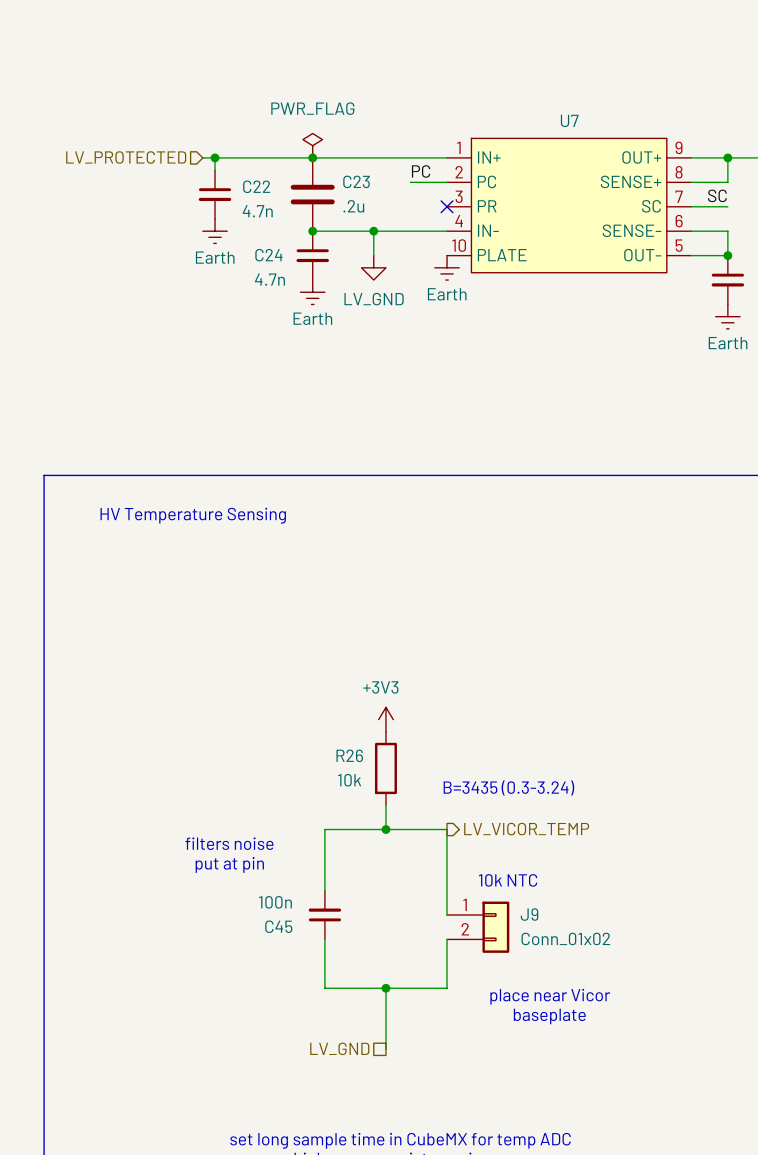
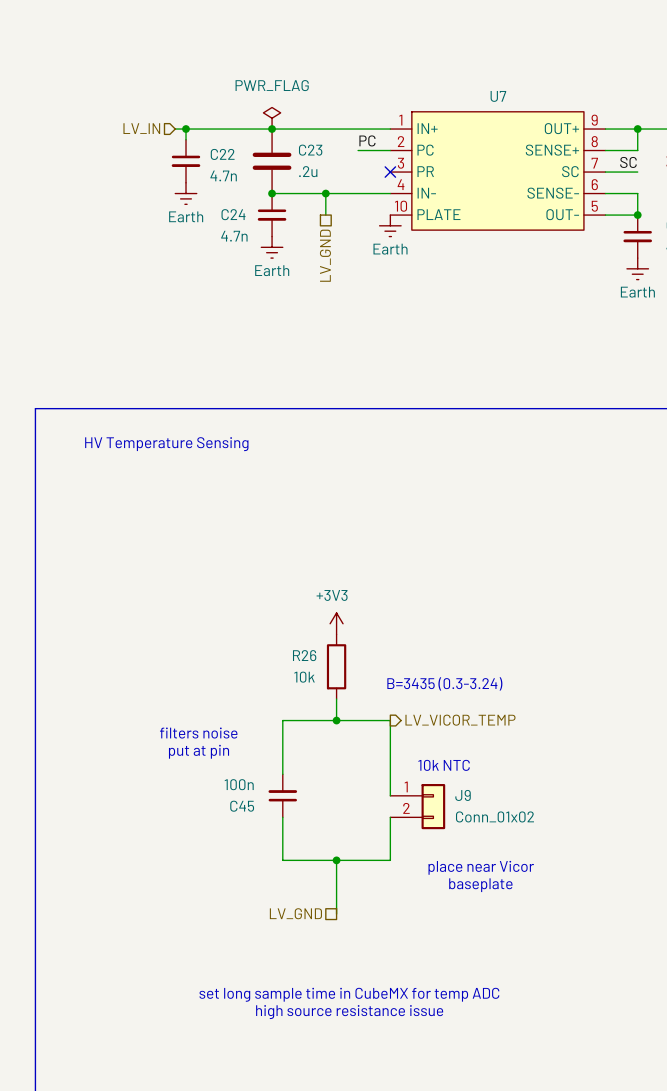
hierarchical label: LV_PROTECTED (126, 157) -> LV_IN (141, 128)
power symbol: LV_GND (373, 267) -> none
hierarchical label: none -> LV_GND (325, 255)

